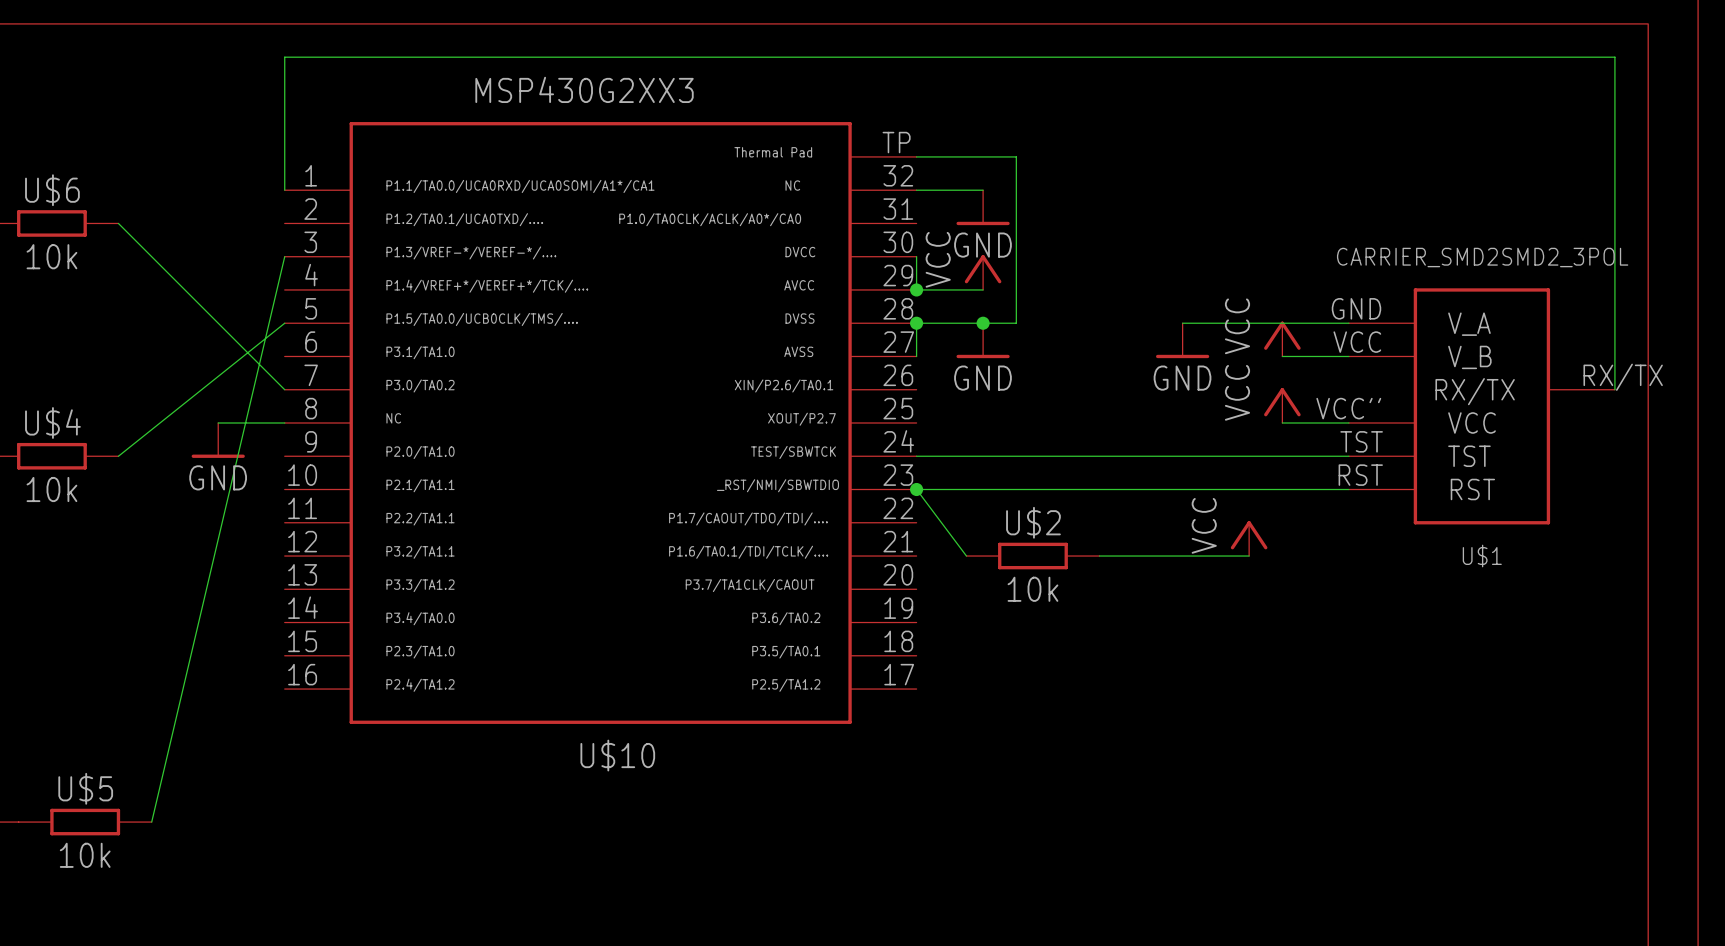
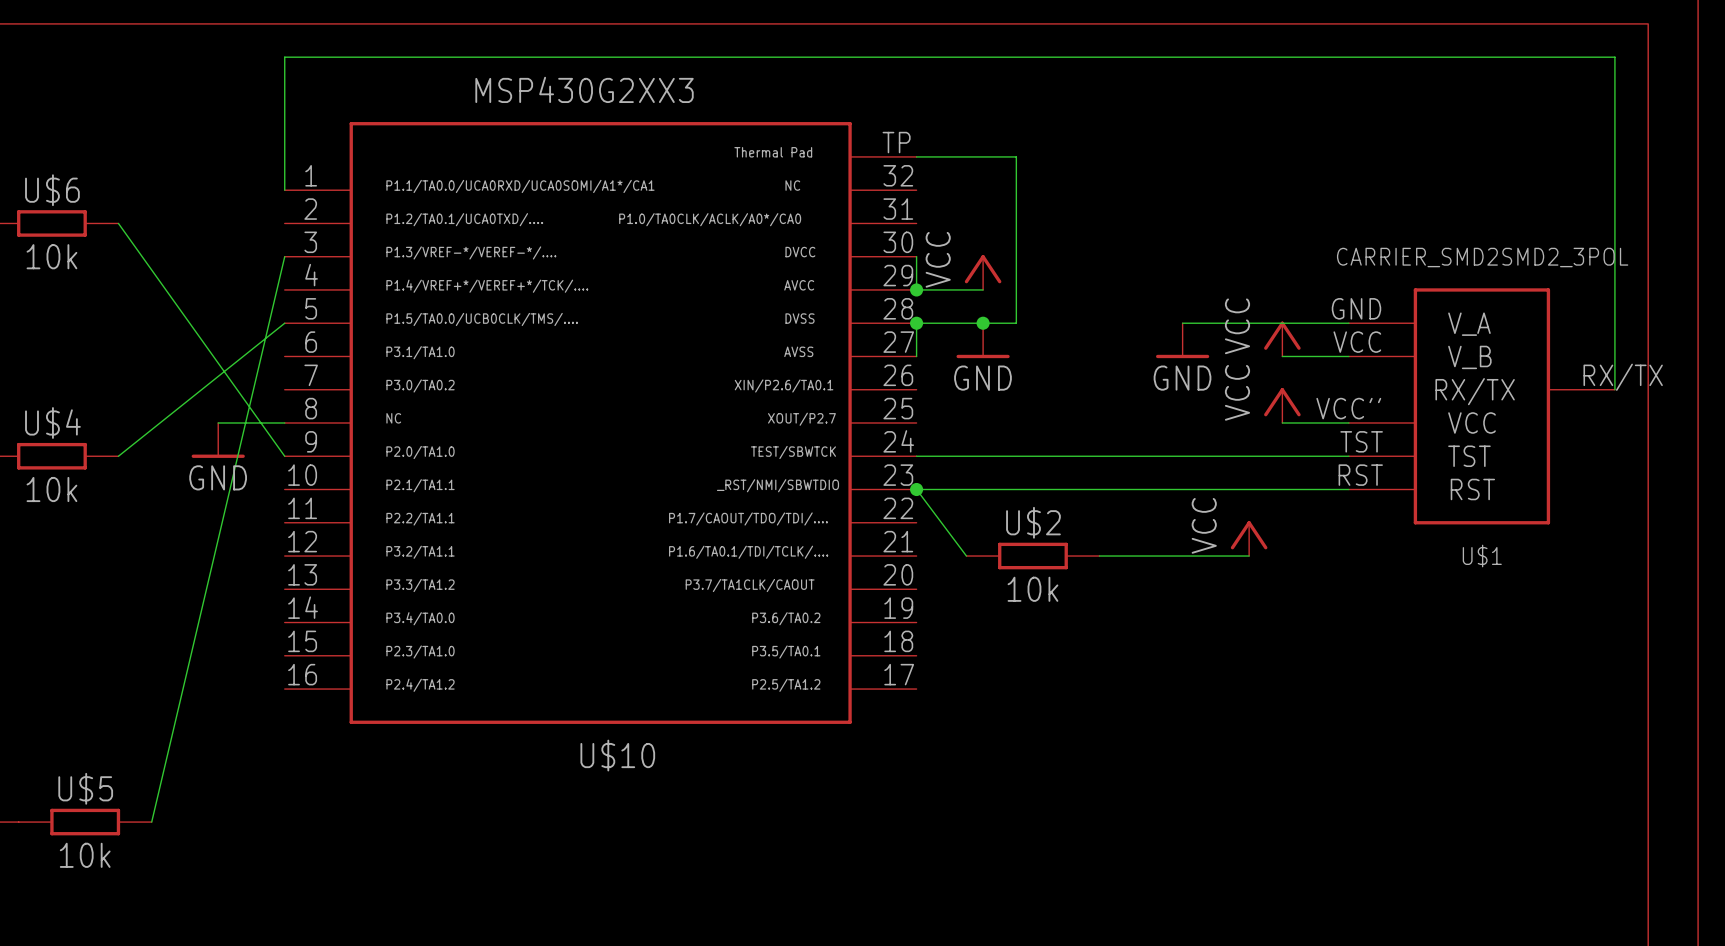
wire: (916, 190) (983, 190) -> none
power symbol: GND (983, 207) -> none
wire: (118, 223) (284, 389) -> (118, 223) (284, 456)

